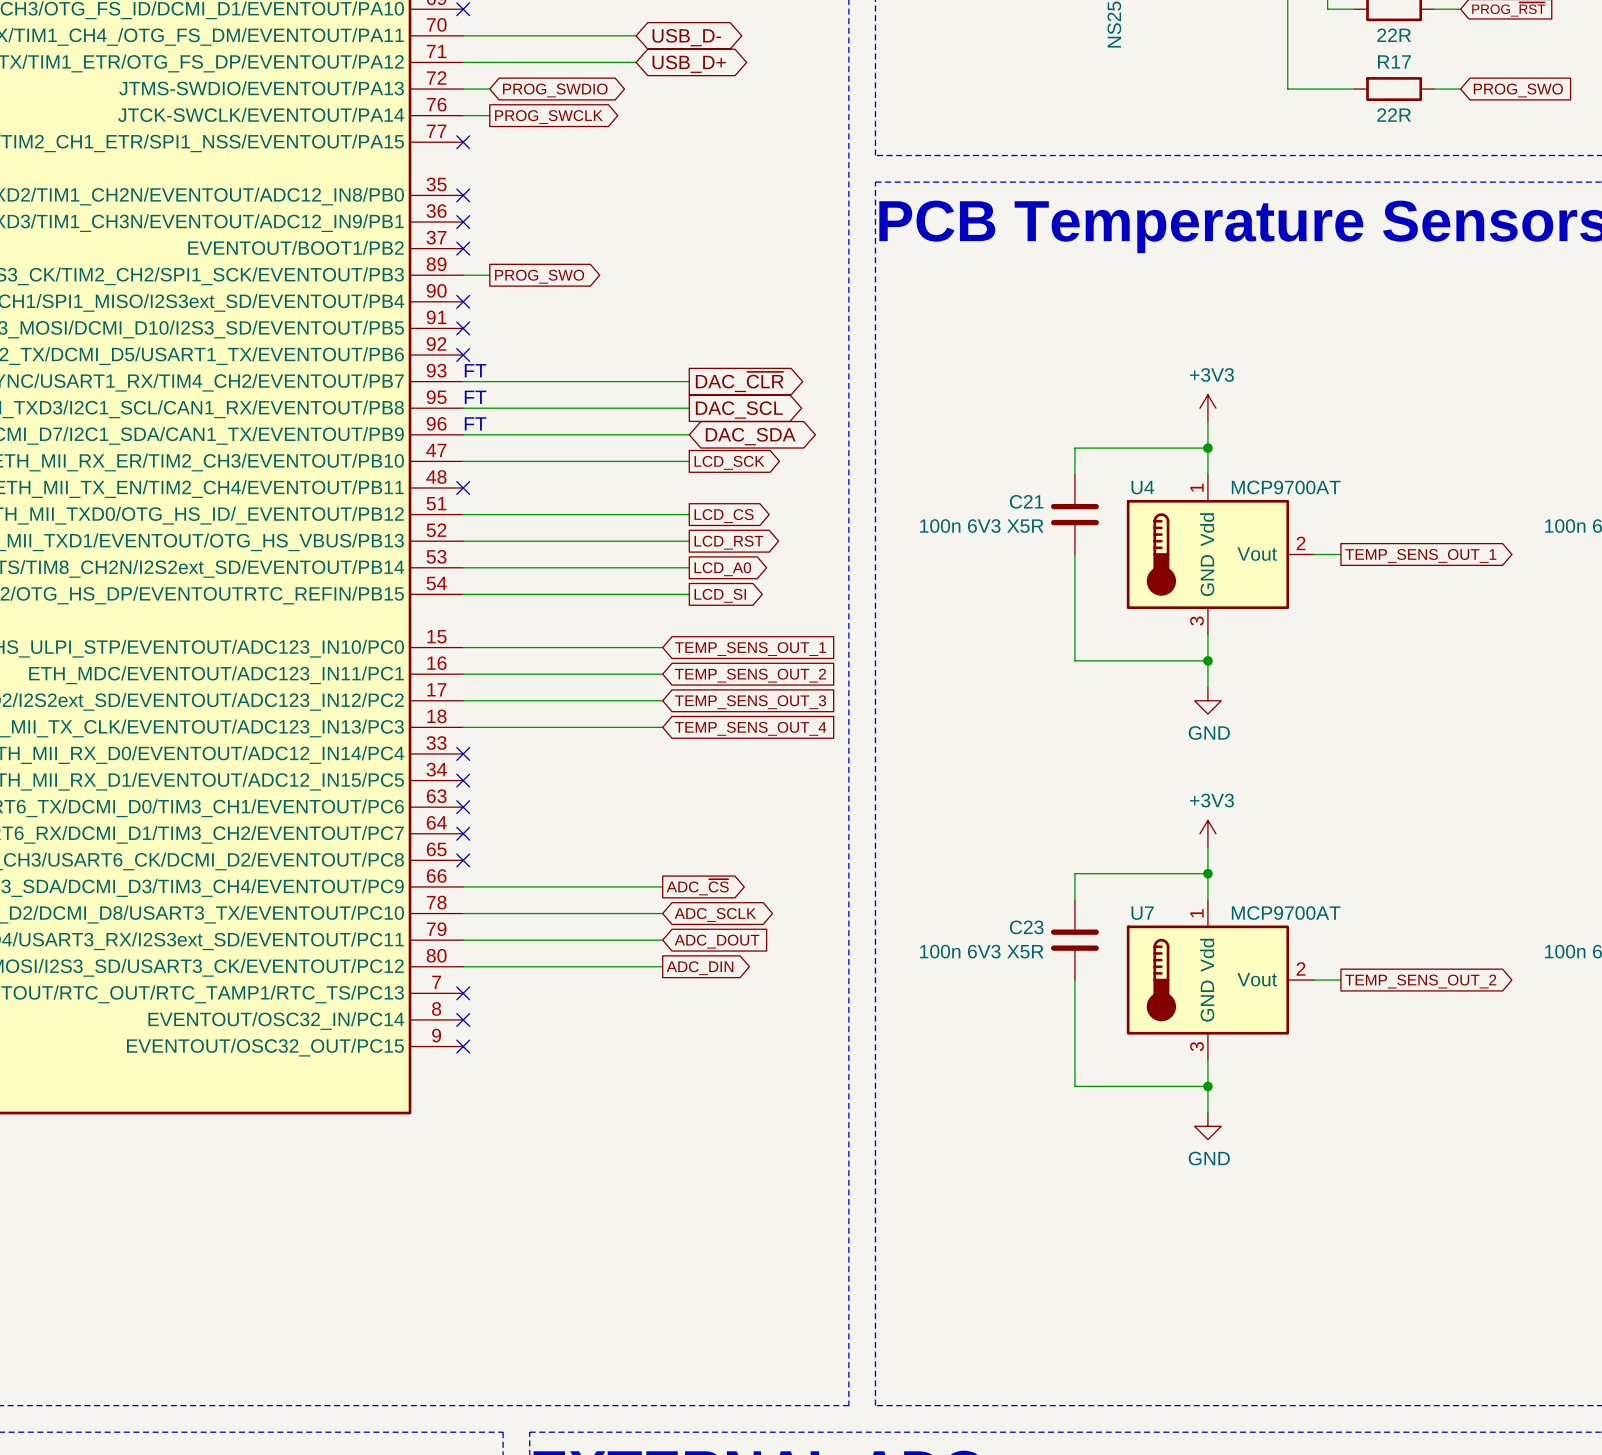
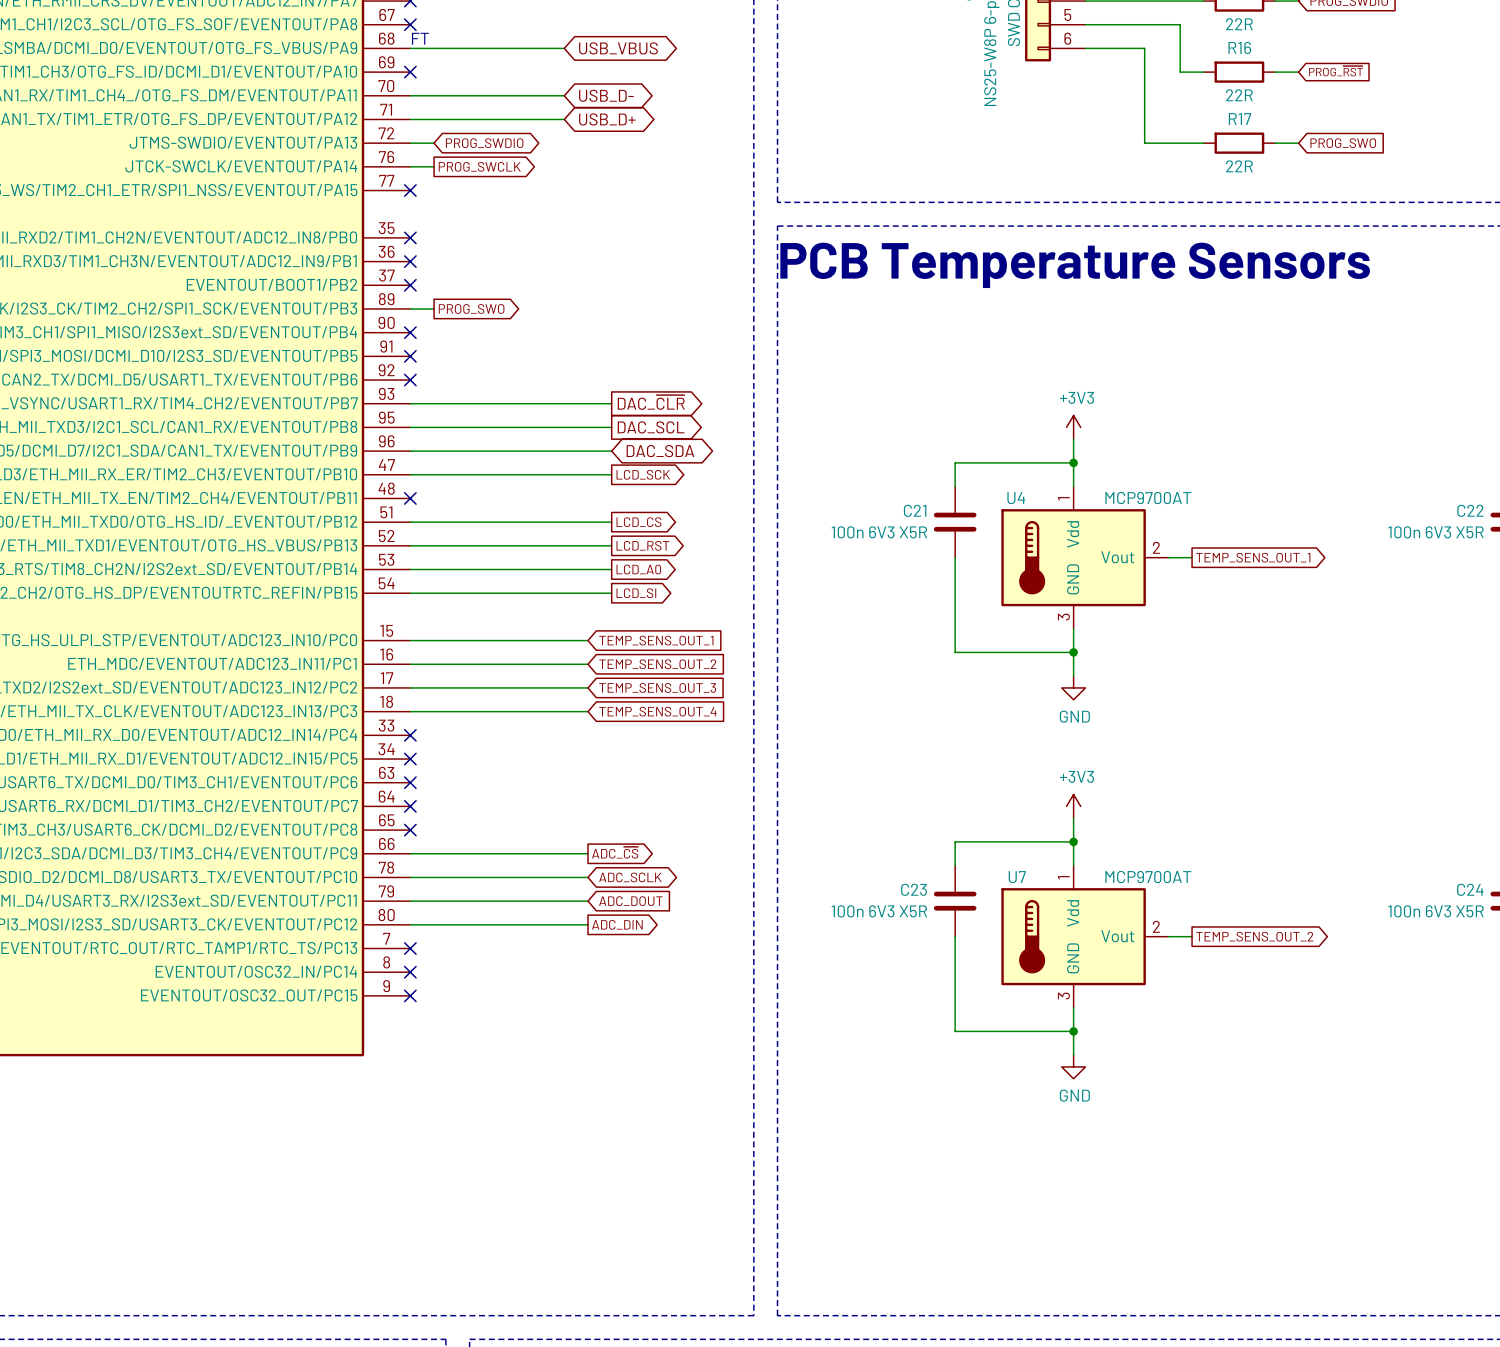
text: FT (475, 370) -> none
text: FT (475, 397) -> none
text: FT (475, 423) -> none

